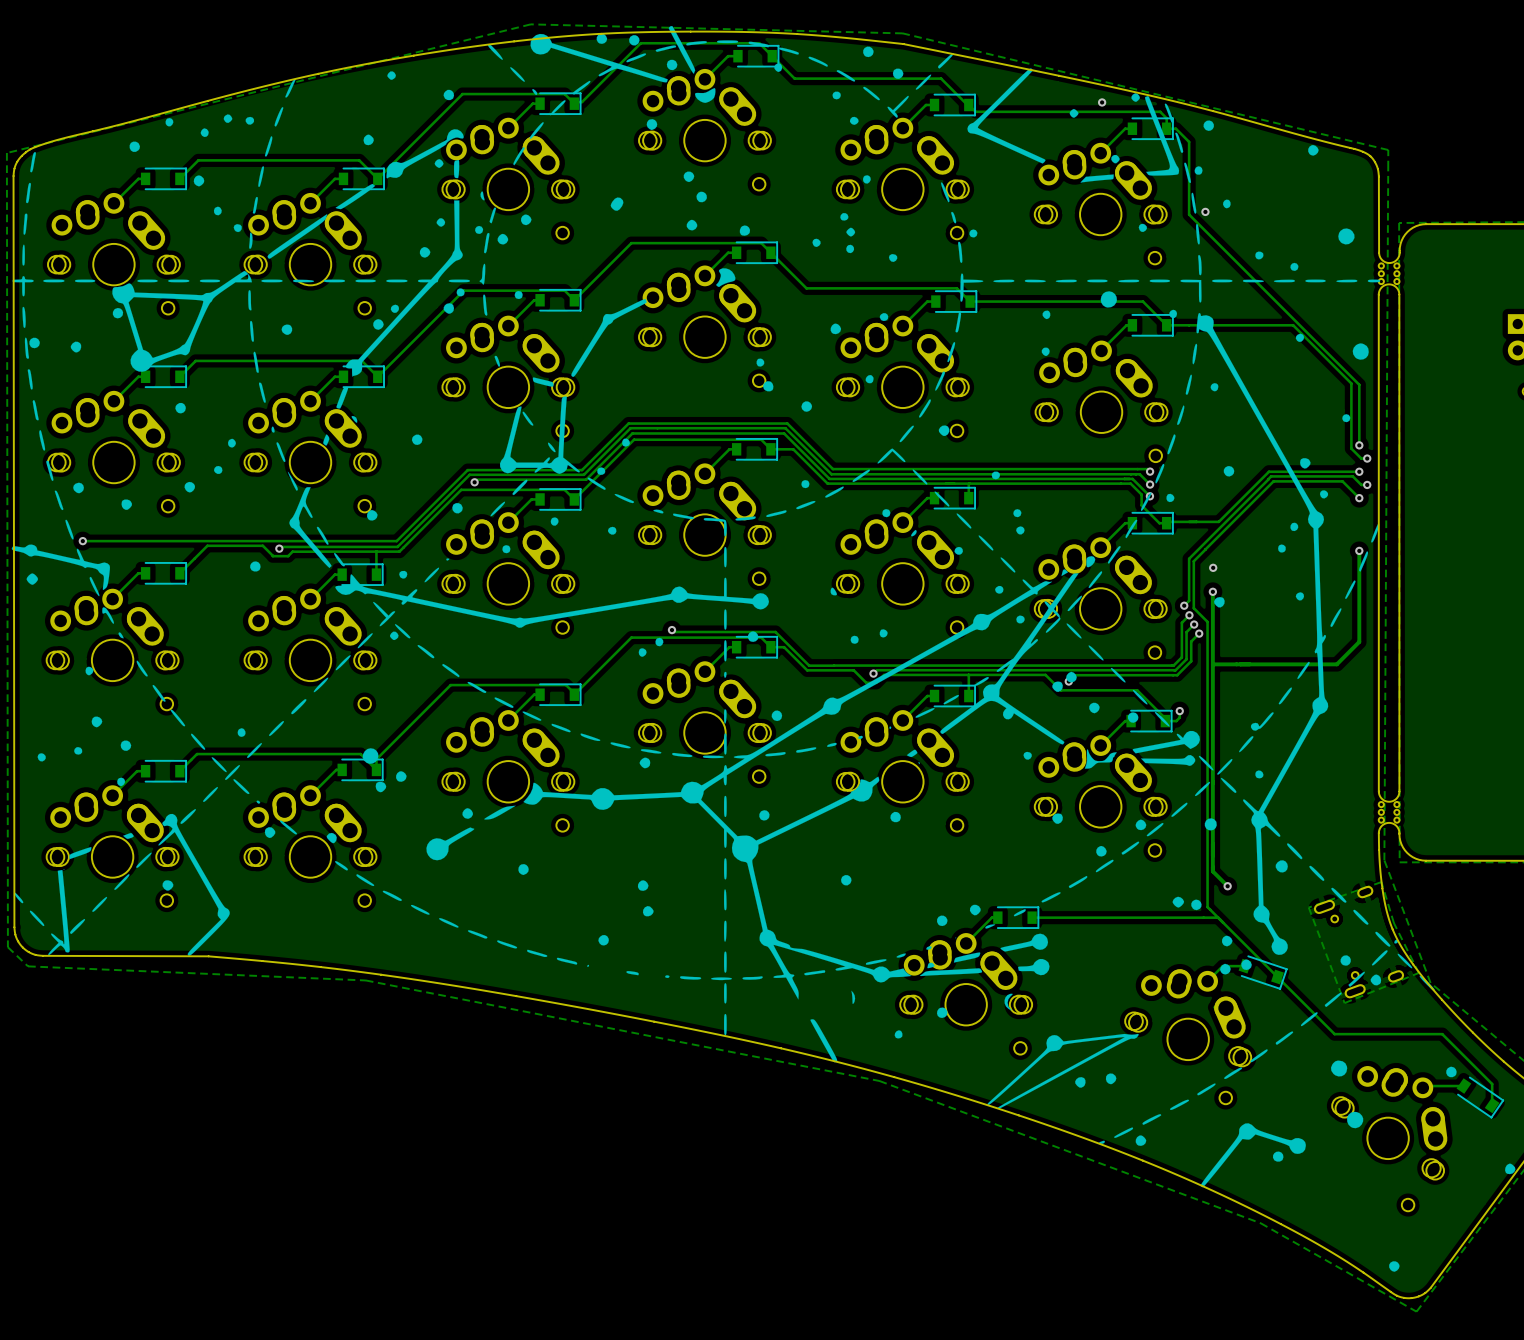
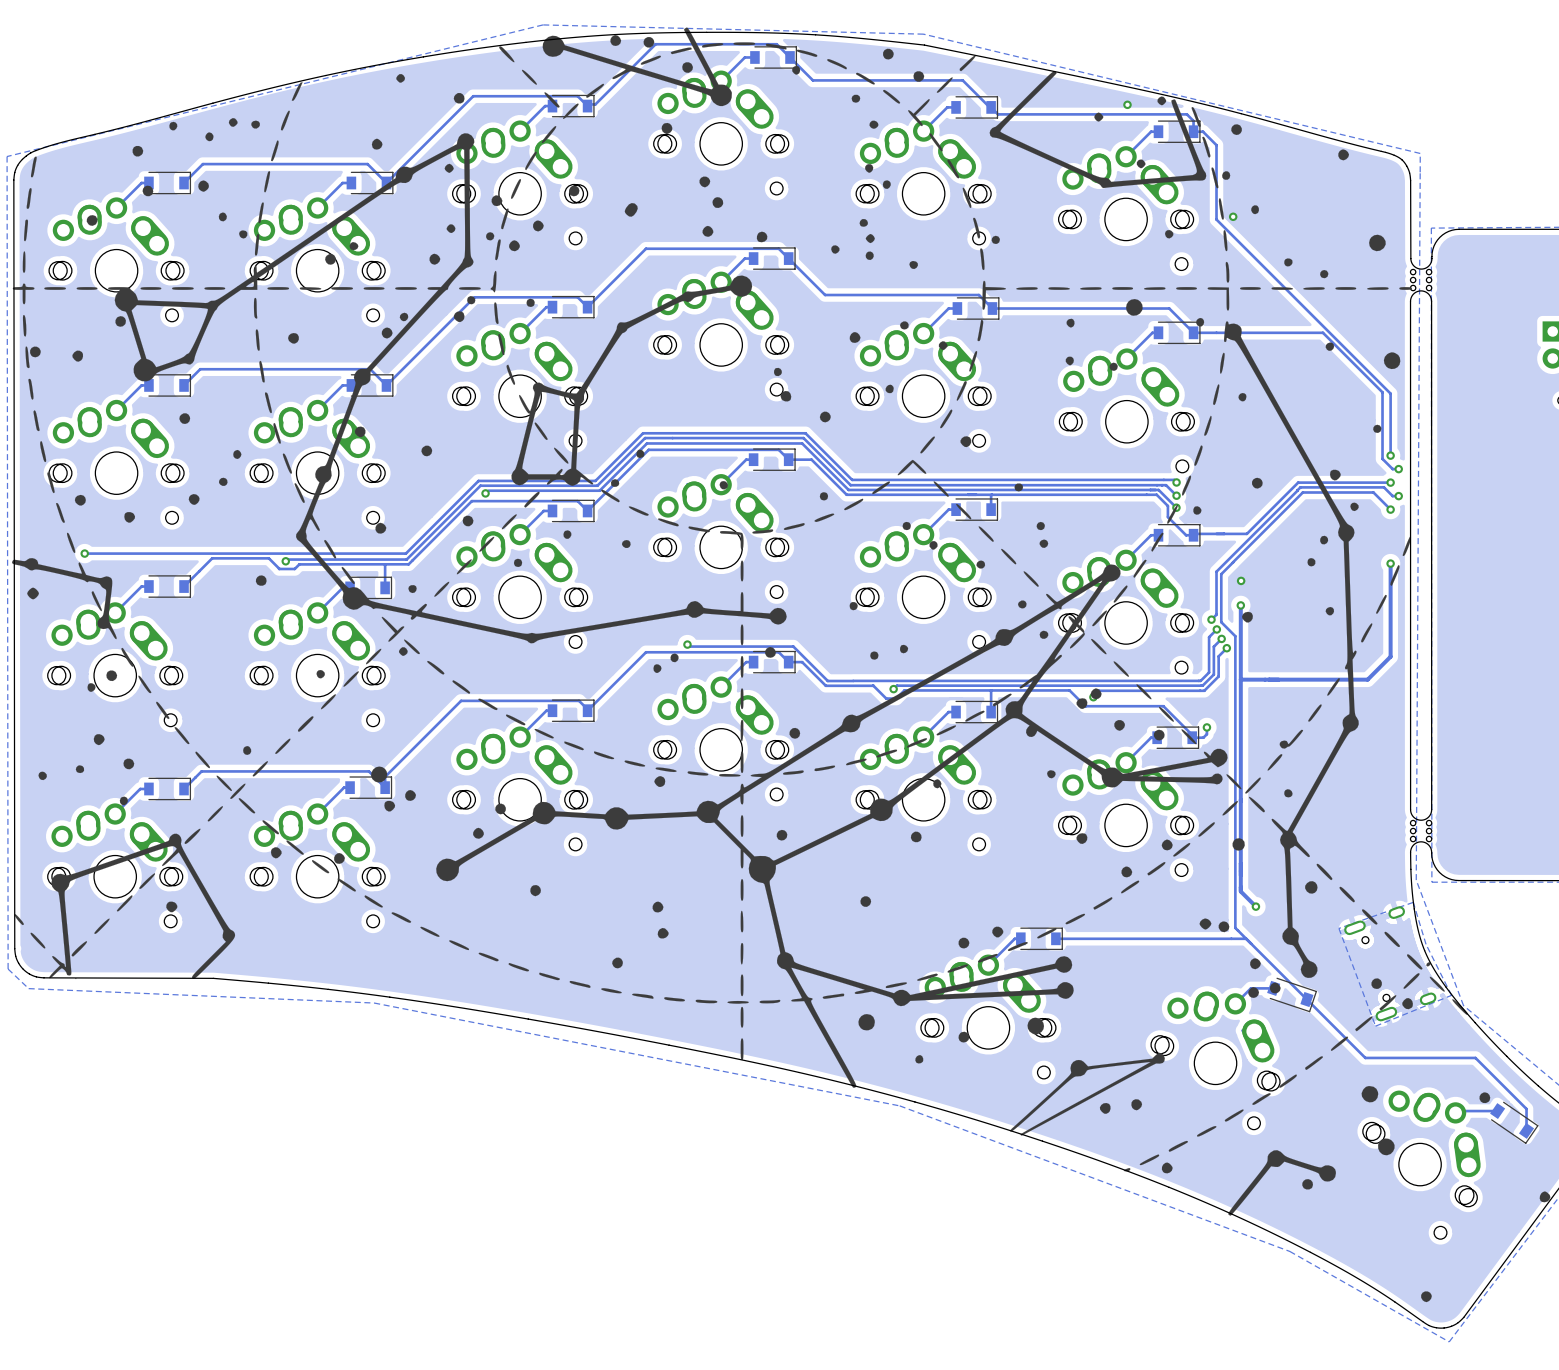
drawing shape: [11, 26, 1516, 1272] -> [11, 27, 1551, 1303]

